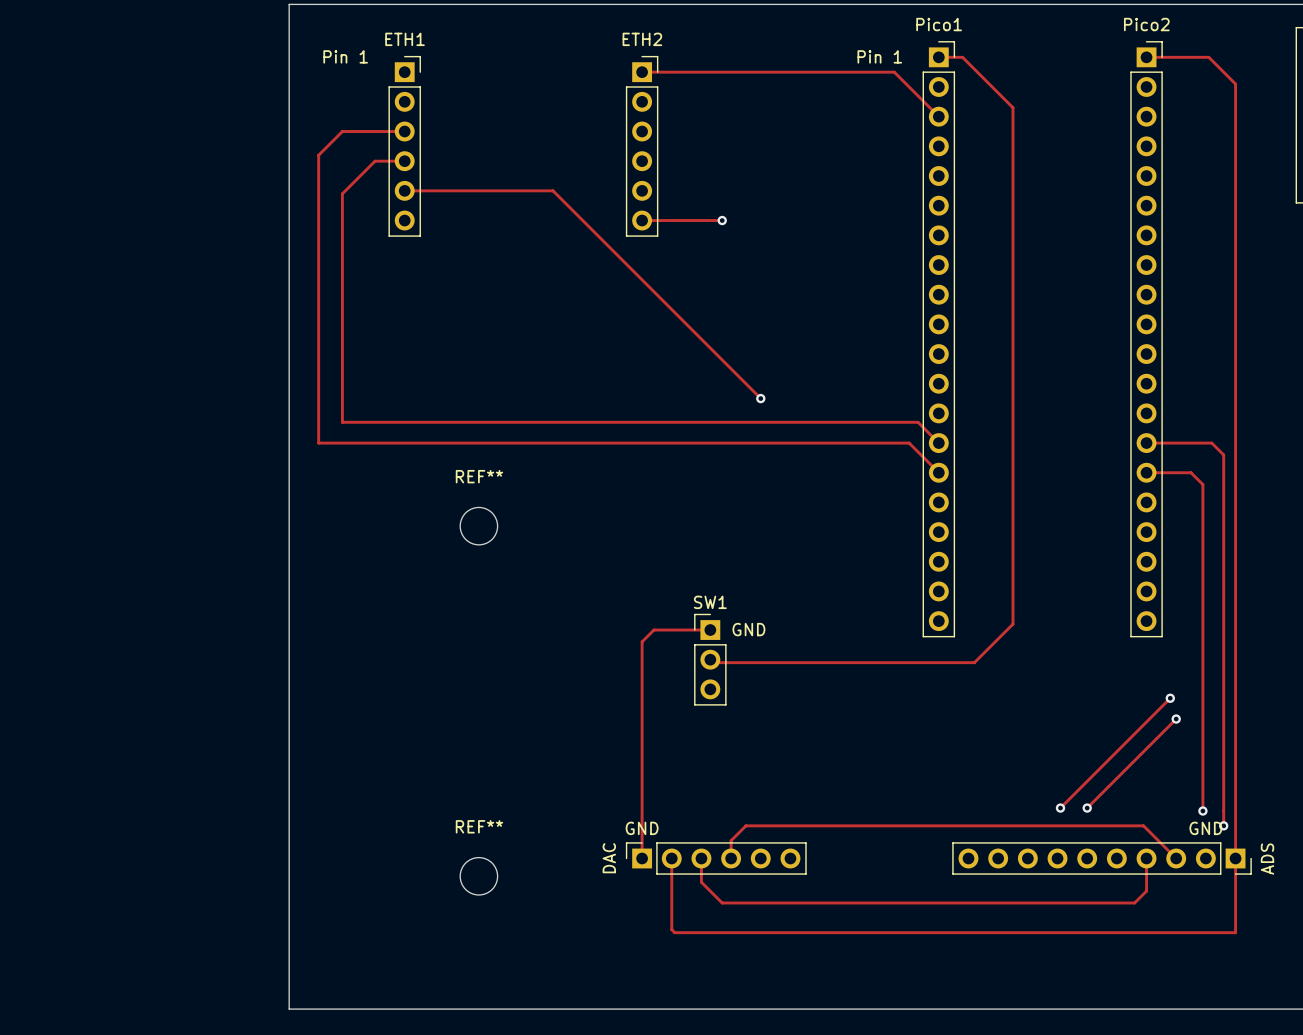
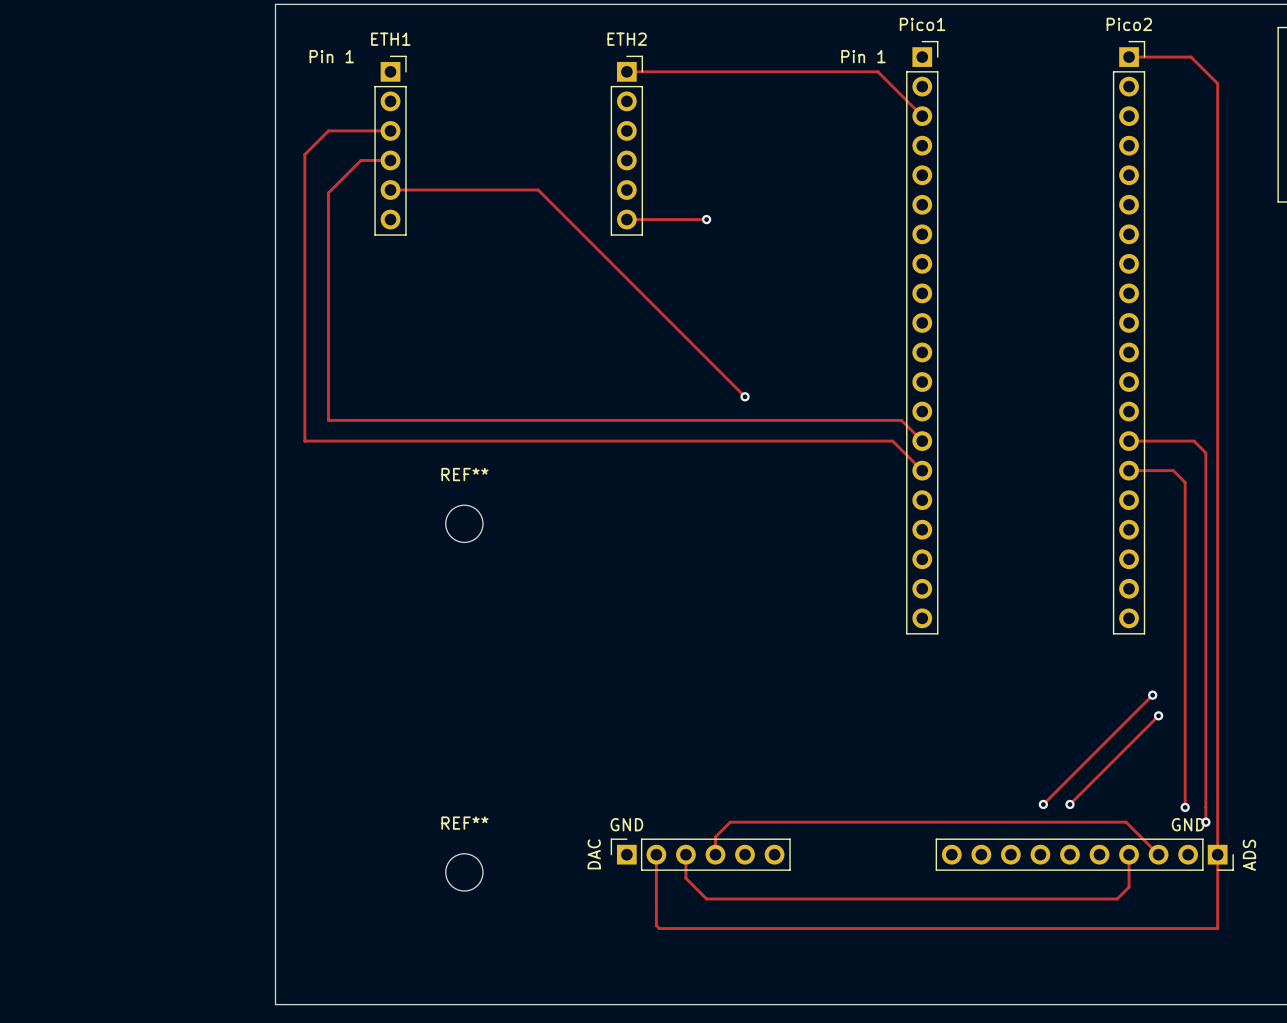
track: (938, 57) (962, 57) (1013, 107) (1013, 624) (974, 662) (713, 662) (710, 659) -> none
text: GND (748, 629) -> none
track: (710, 630) (653, 630) (642, 641) (642, 858) -> none
SW1: (710, 659) -> none

